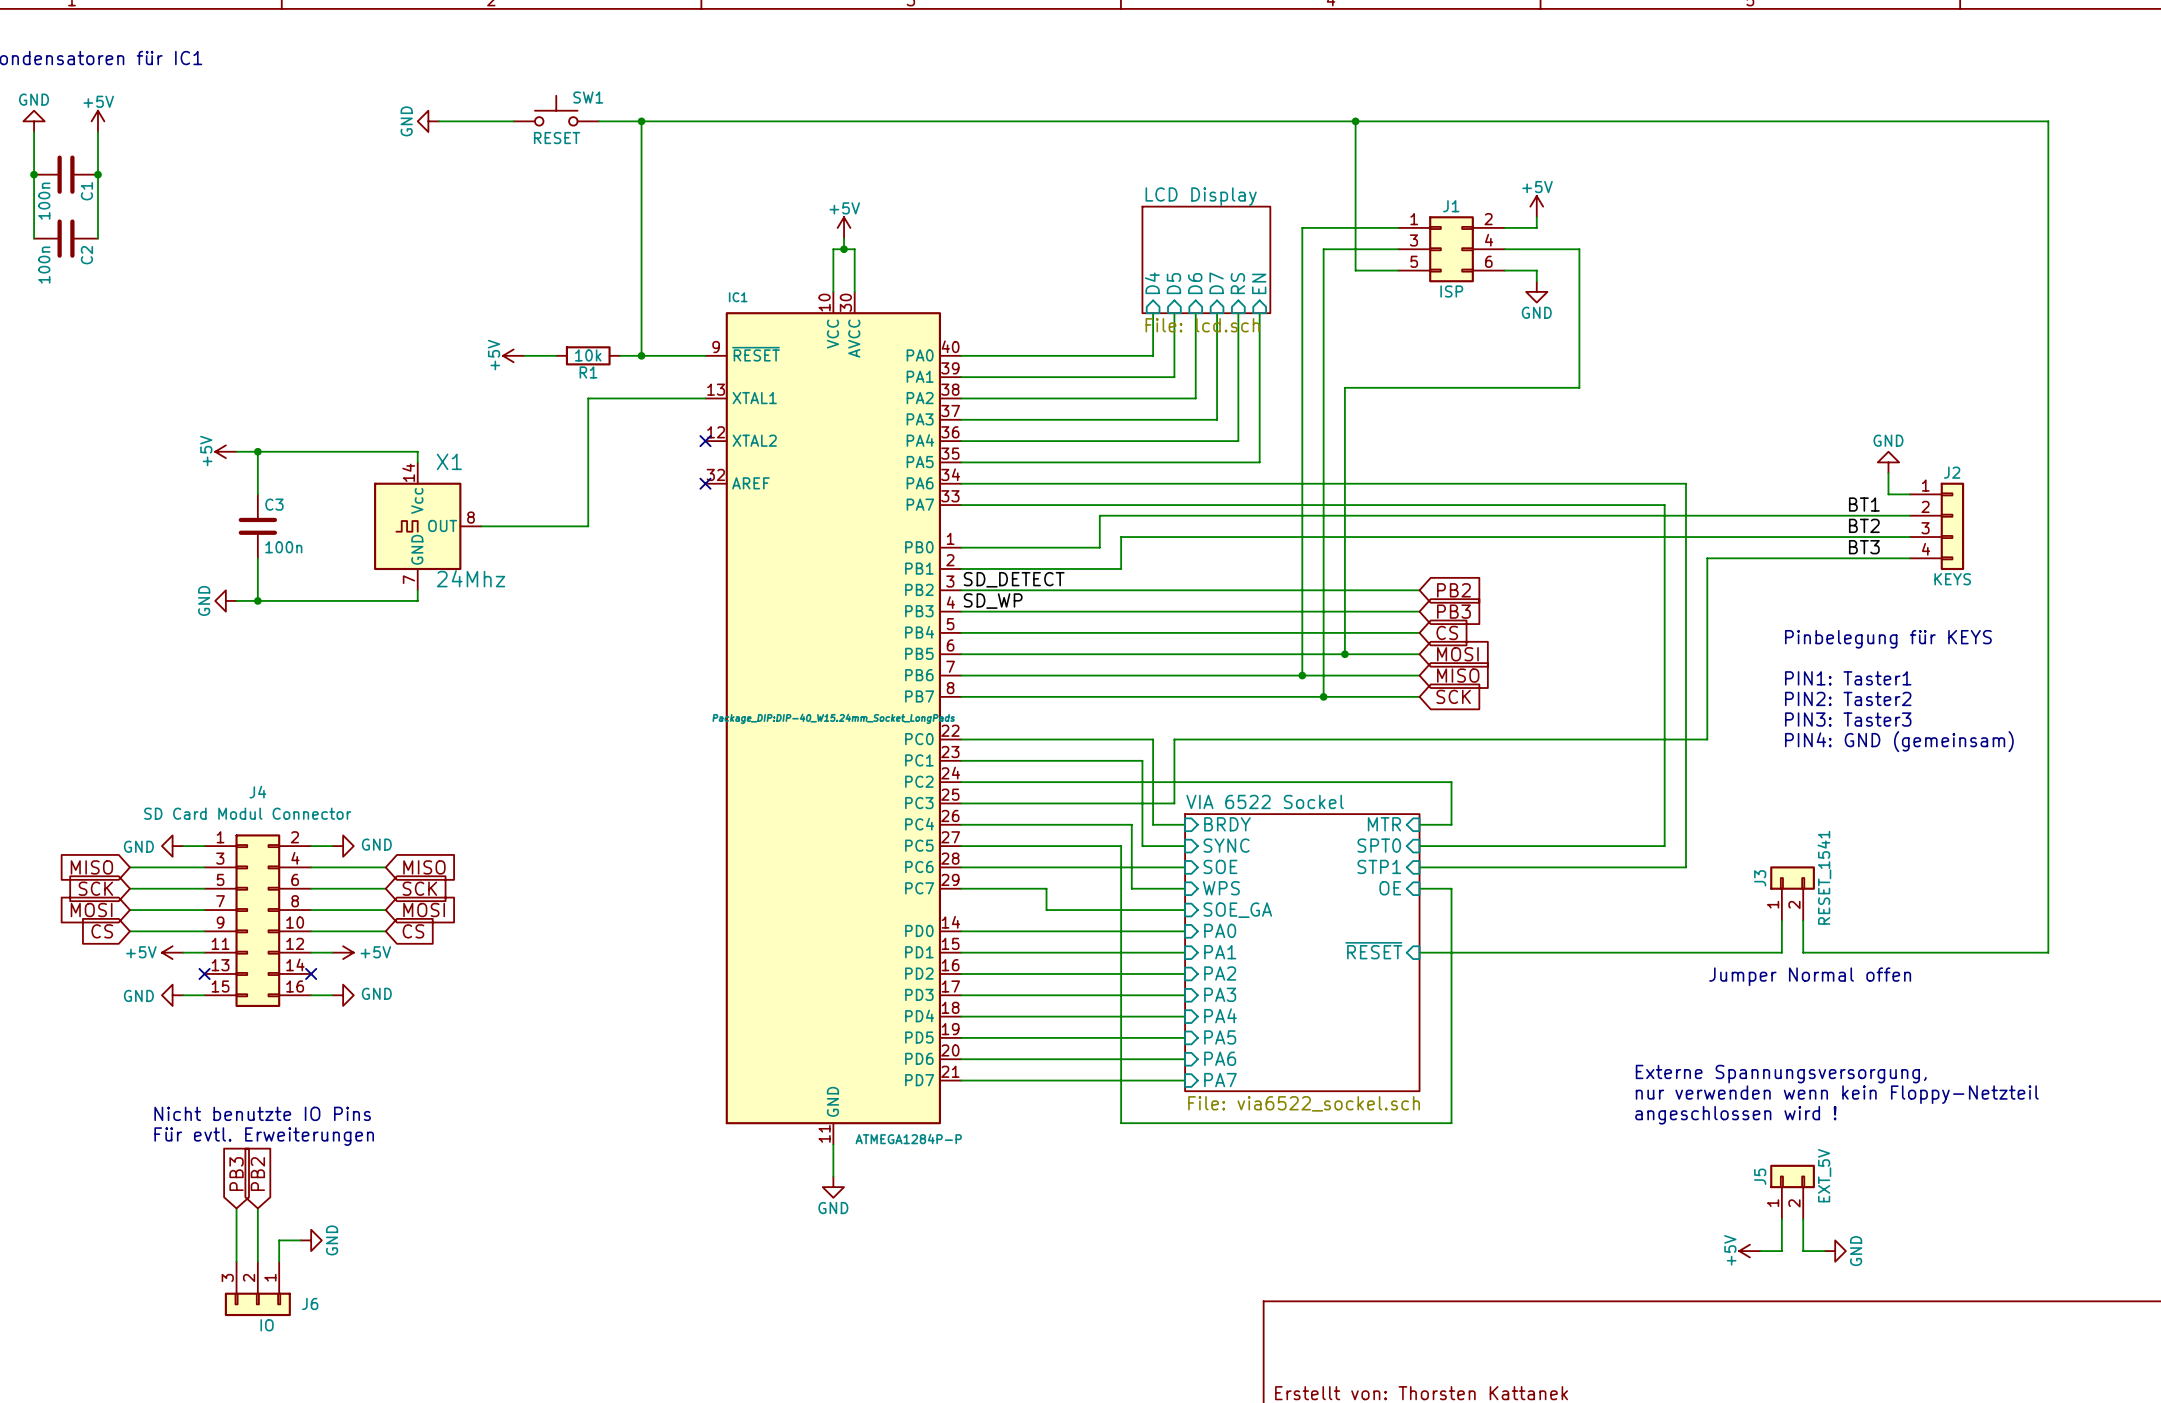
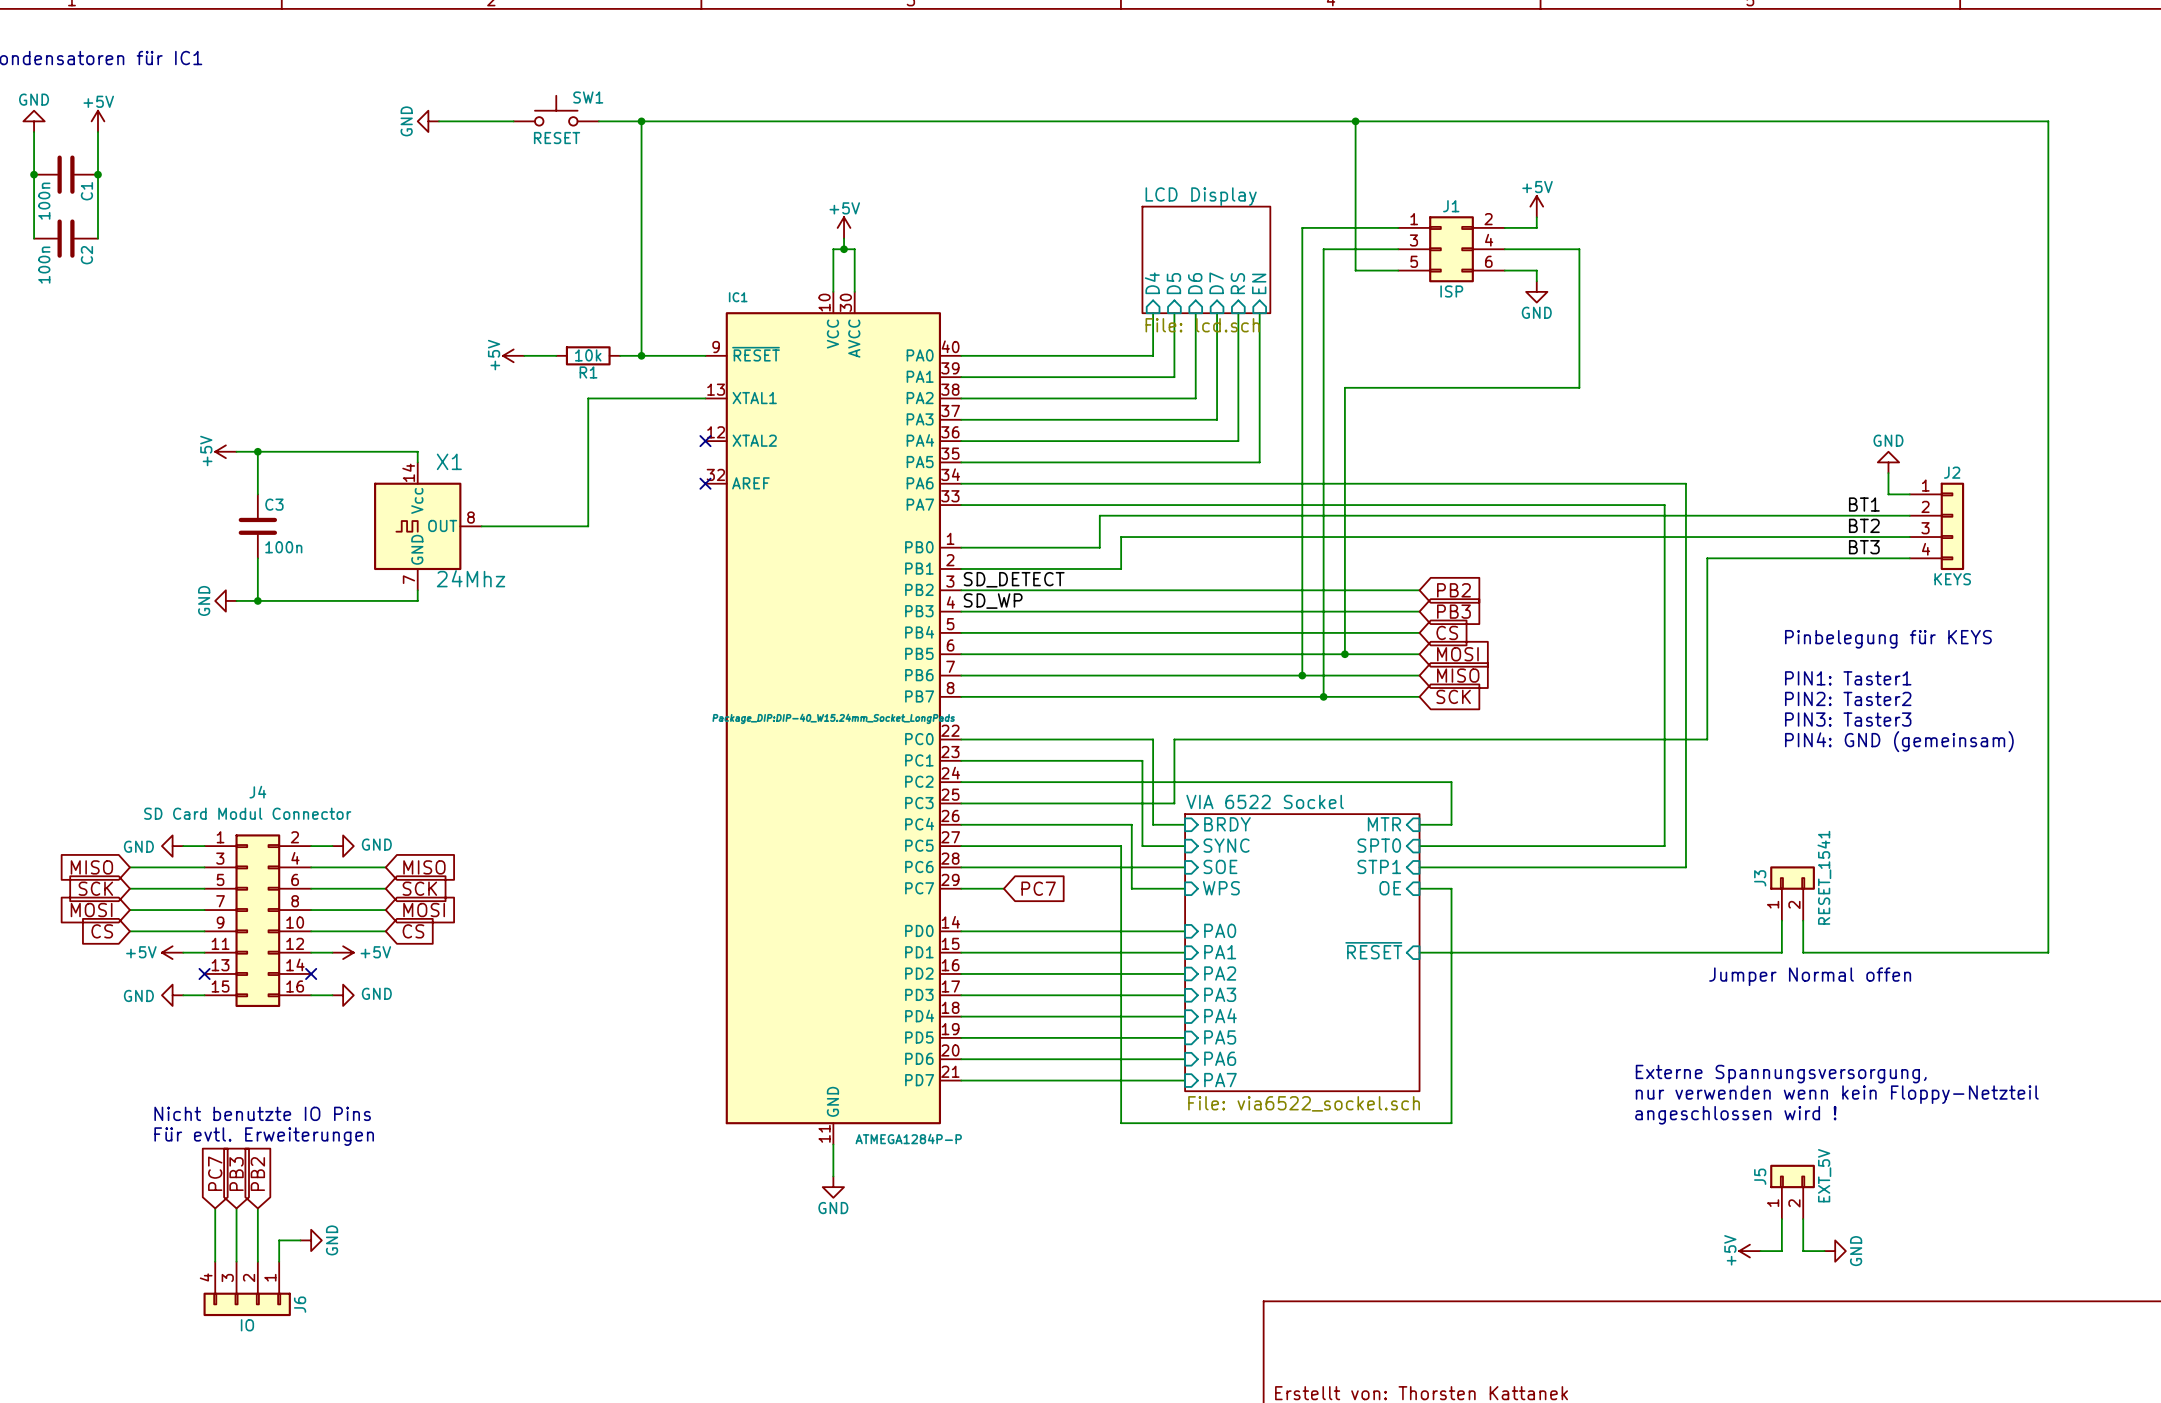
wire: (1003, 888) (1046, 888) (1046, 910) (1185, 910) -> none
global label: none -> PC7 (1038, 888)
sheet pin: SOE_GA (1237, 910) -> none
global label: none -> PC7 (215, 1173)
wire: none -> (215, 1208) (215, 1261)
J6 symbol: [224, 1261, 291, 1317] -> [203, 1261, 291, 1317]

